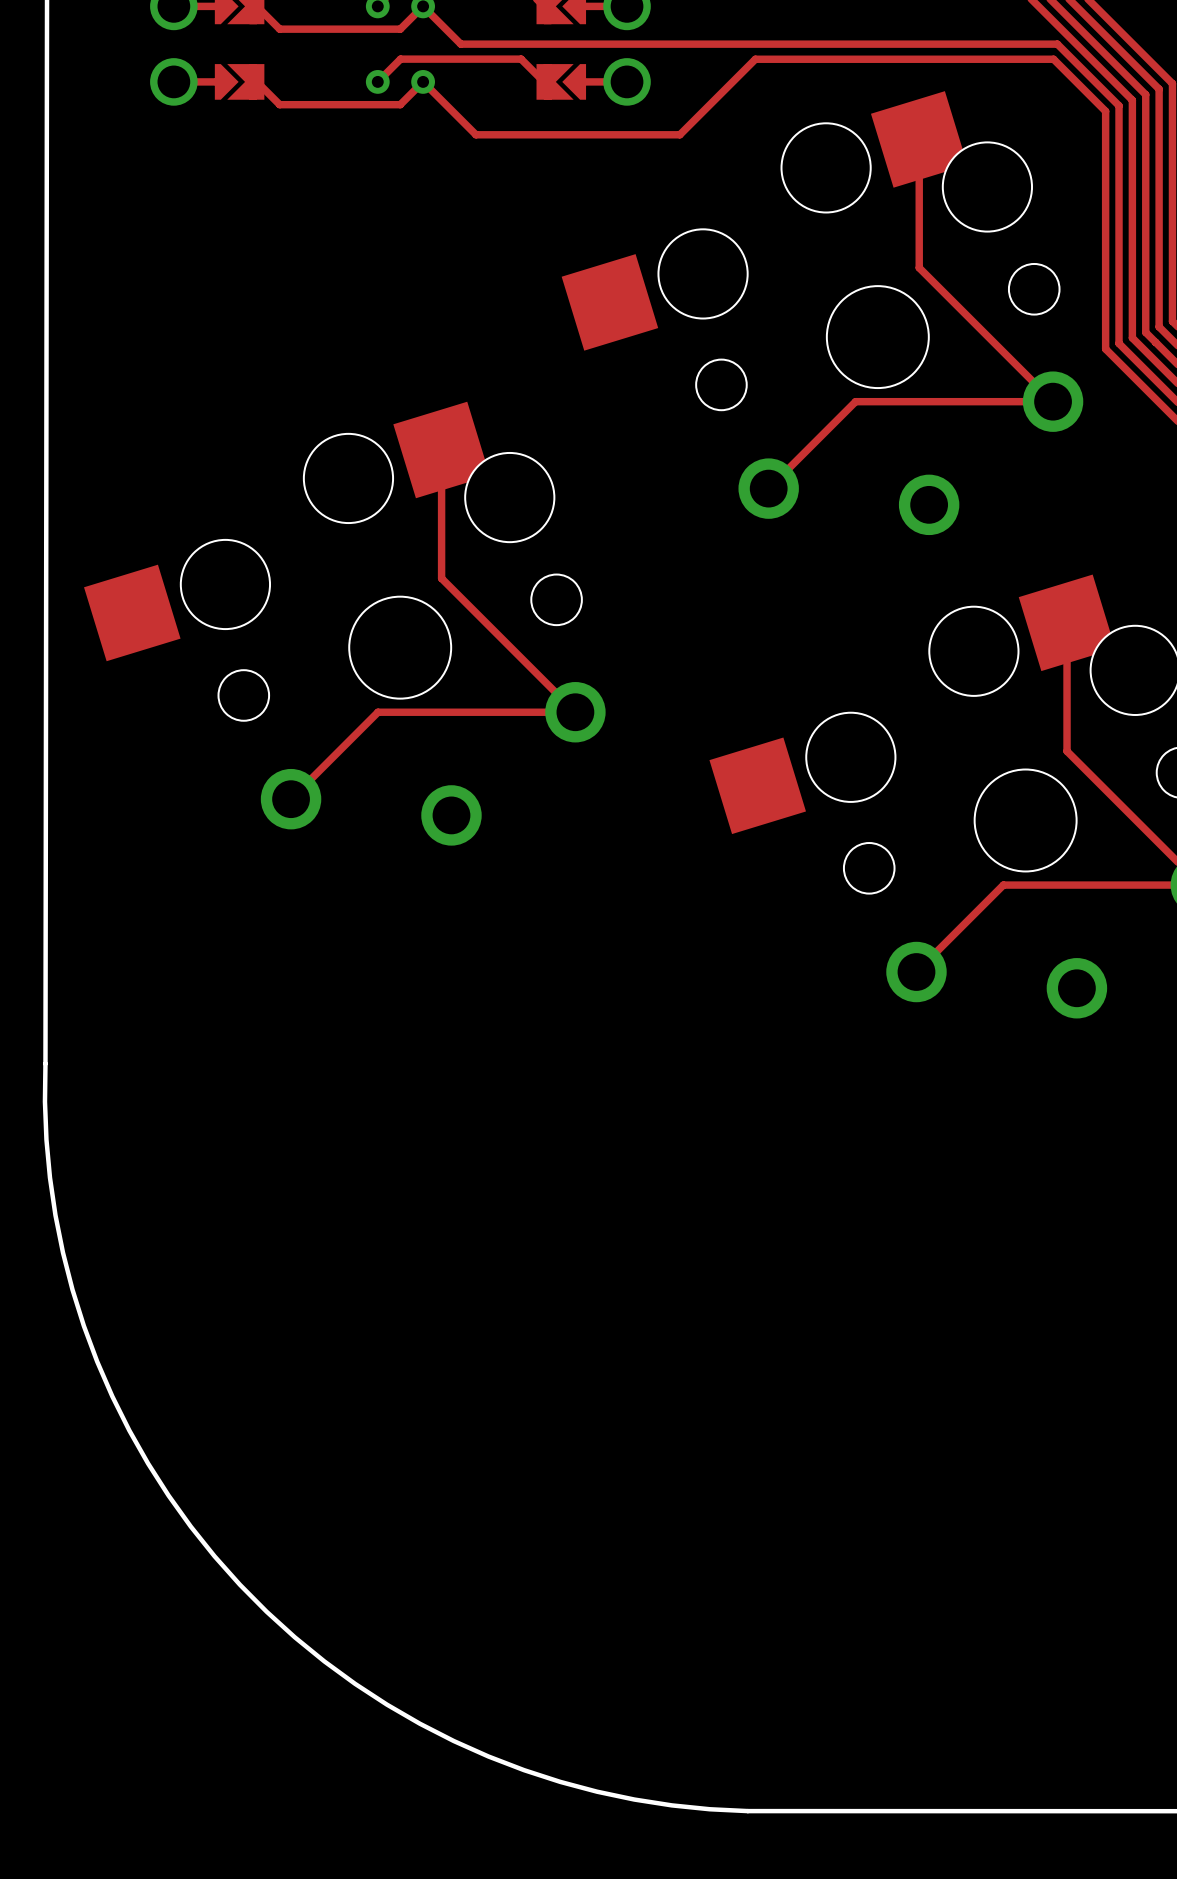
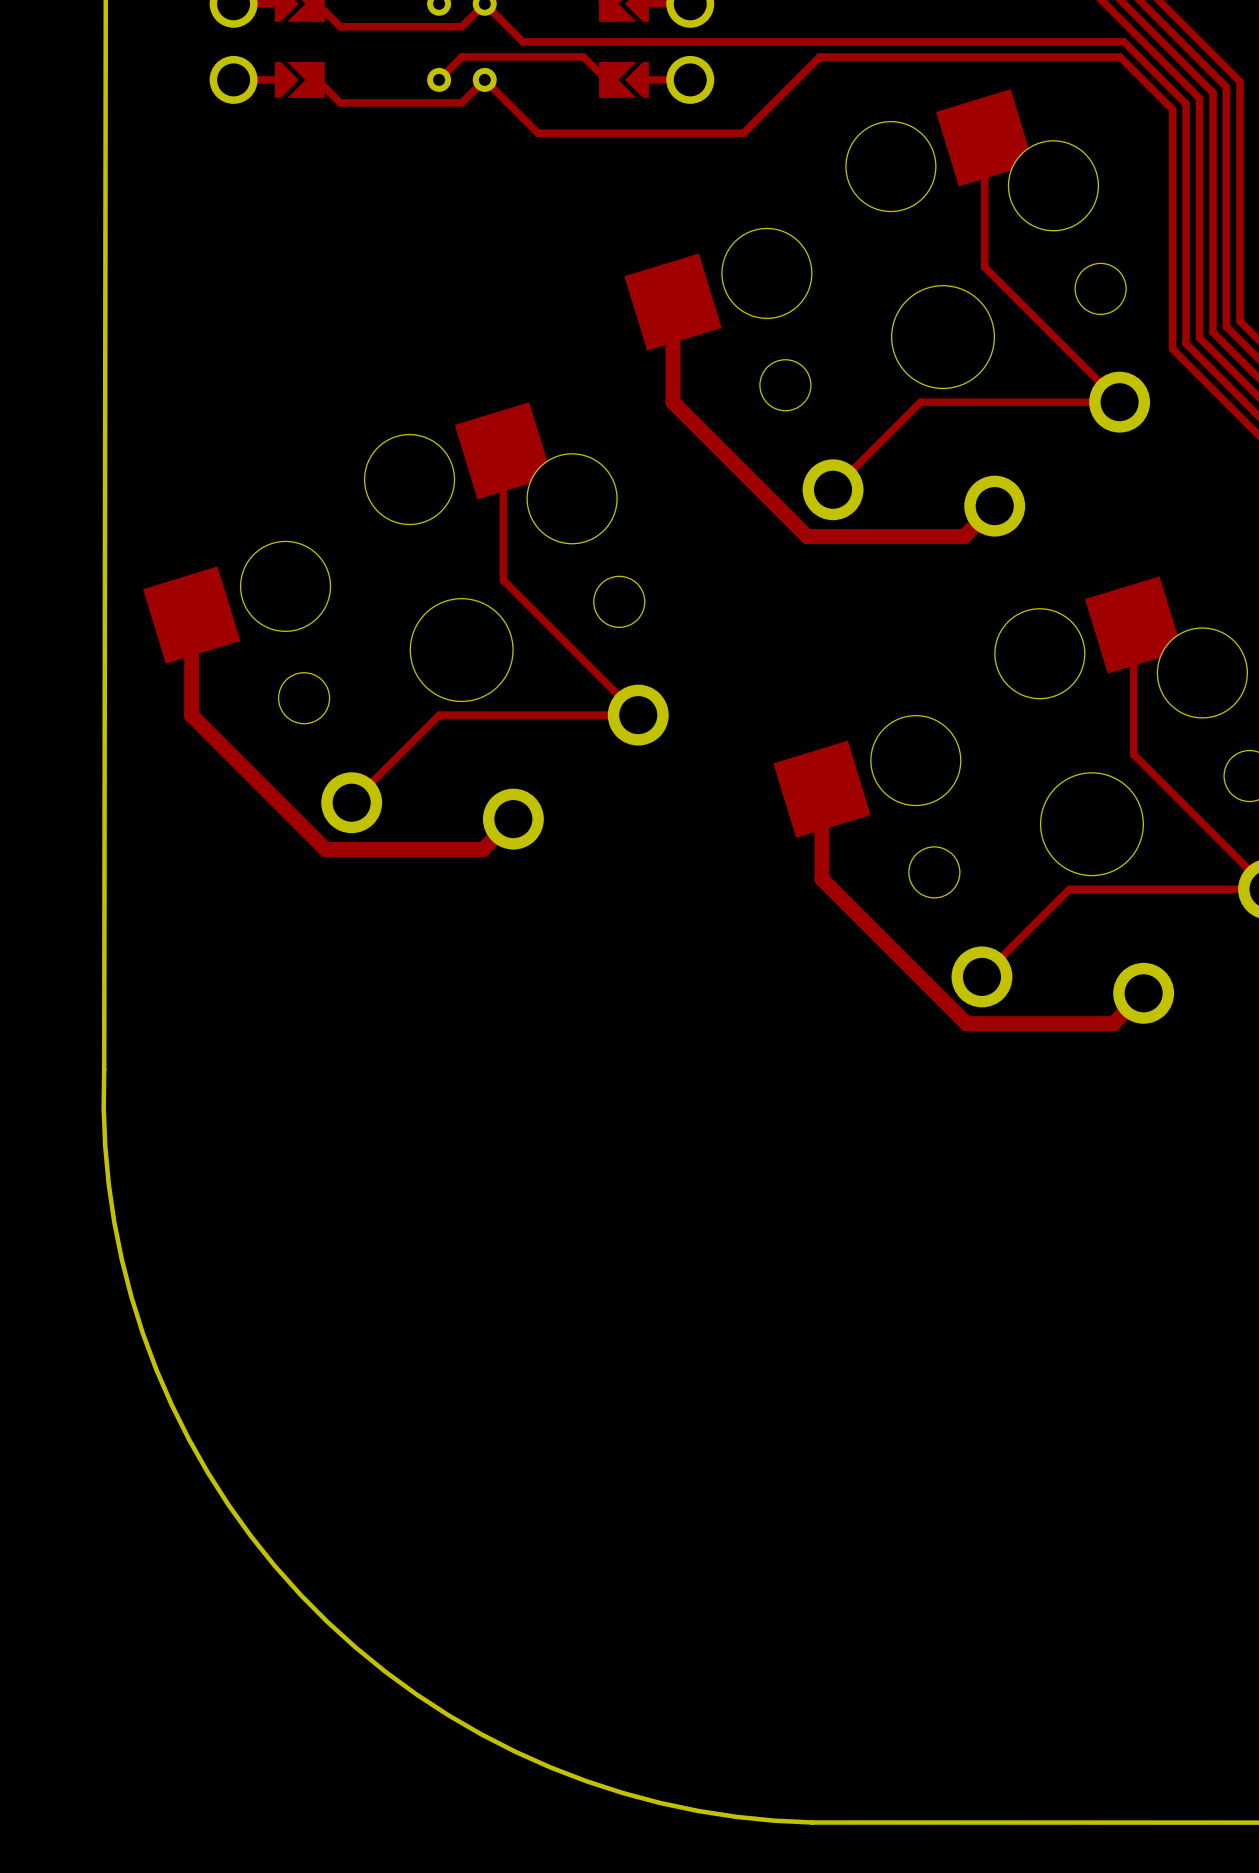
track: none -> (673, 302) (673, 402) (807, 536) (964, 536) (994, 506)
track: none -> (191, 615) (191, 715) (325, 849) (482, 849) (513, 819)
track: none -> (821, 789) (821, 879) (966, 1023) (1113, 1023) (1143, 993)

